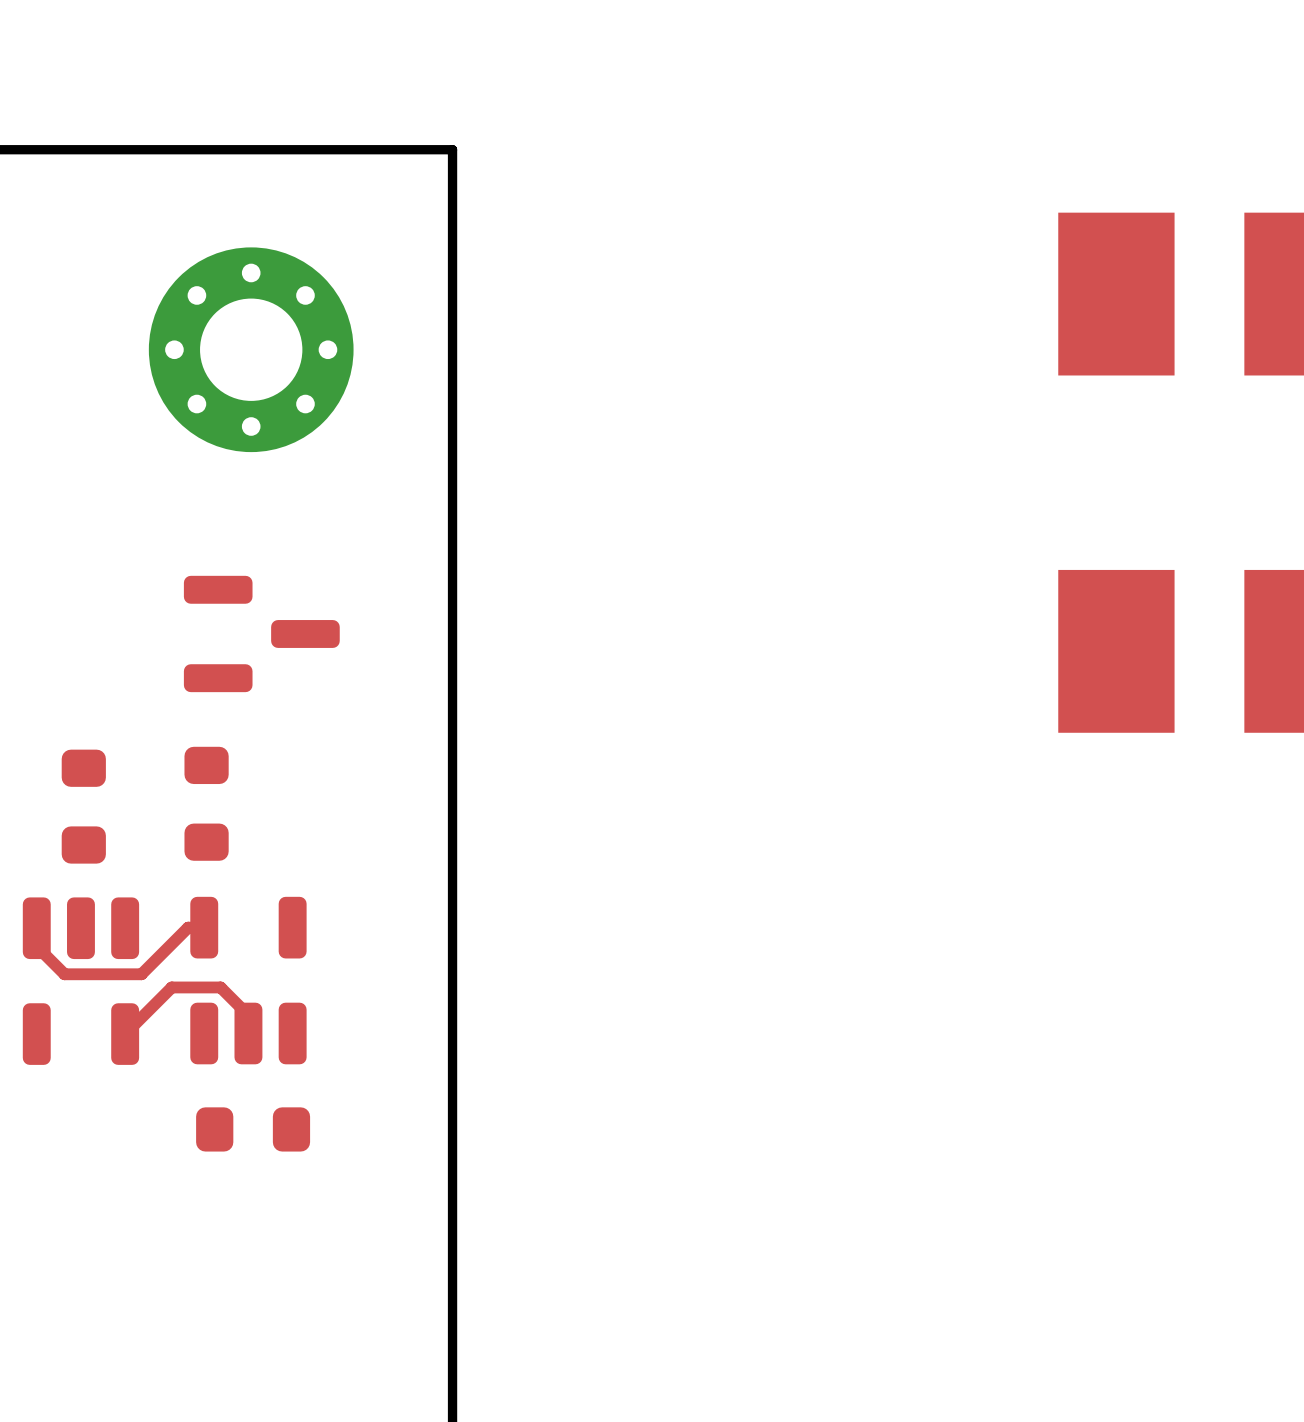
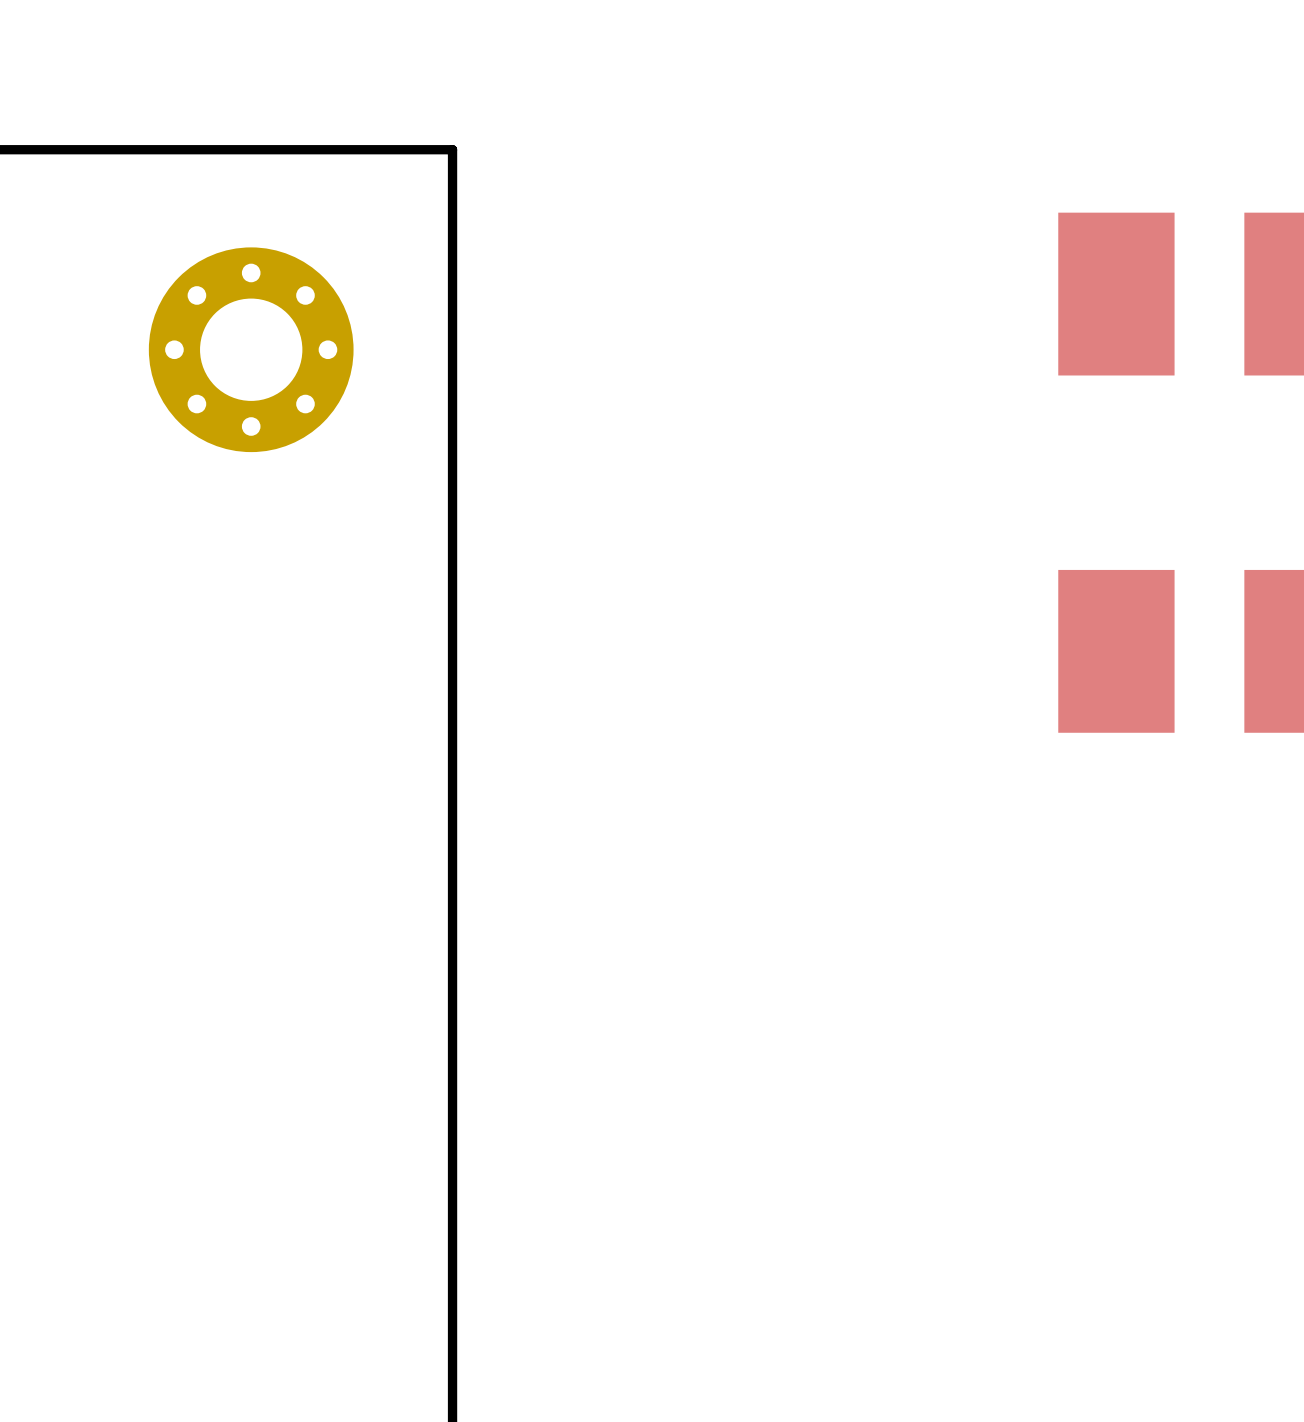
part: (261, 633) -> none
part: (206, 803) -> none
part: (83, 806) -> none
top track: (204, 927) (188, 927) (141, 974) (64, 974) (36, 946) (36, 928) -> none
part: (248, 980) -> none
part: (80, 981) -> none
top track: (248, 1033) (248, 1015) (220, 987) (171, 987) (125, 1034) -> none
part: (253, 1129) -> none

